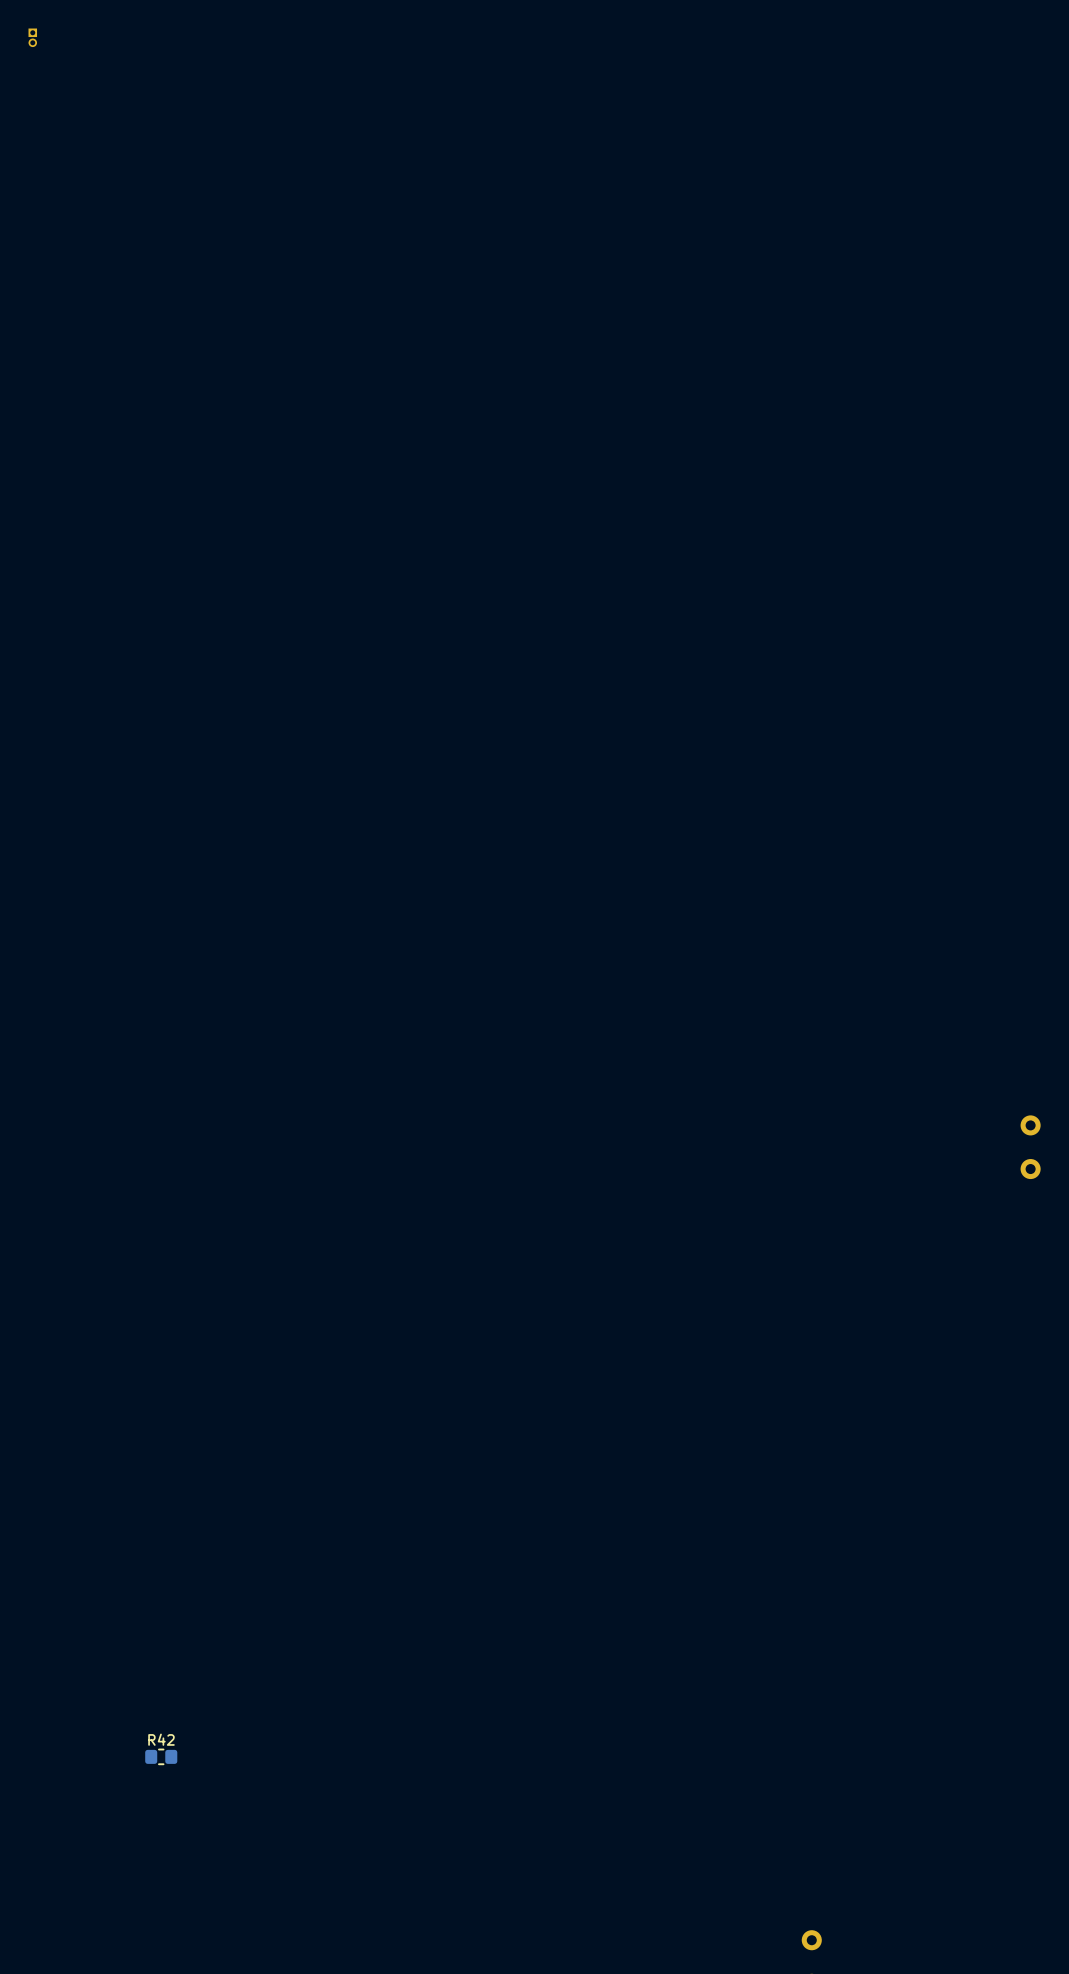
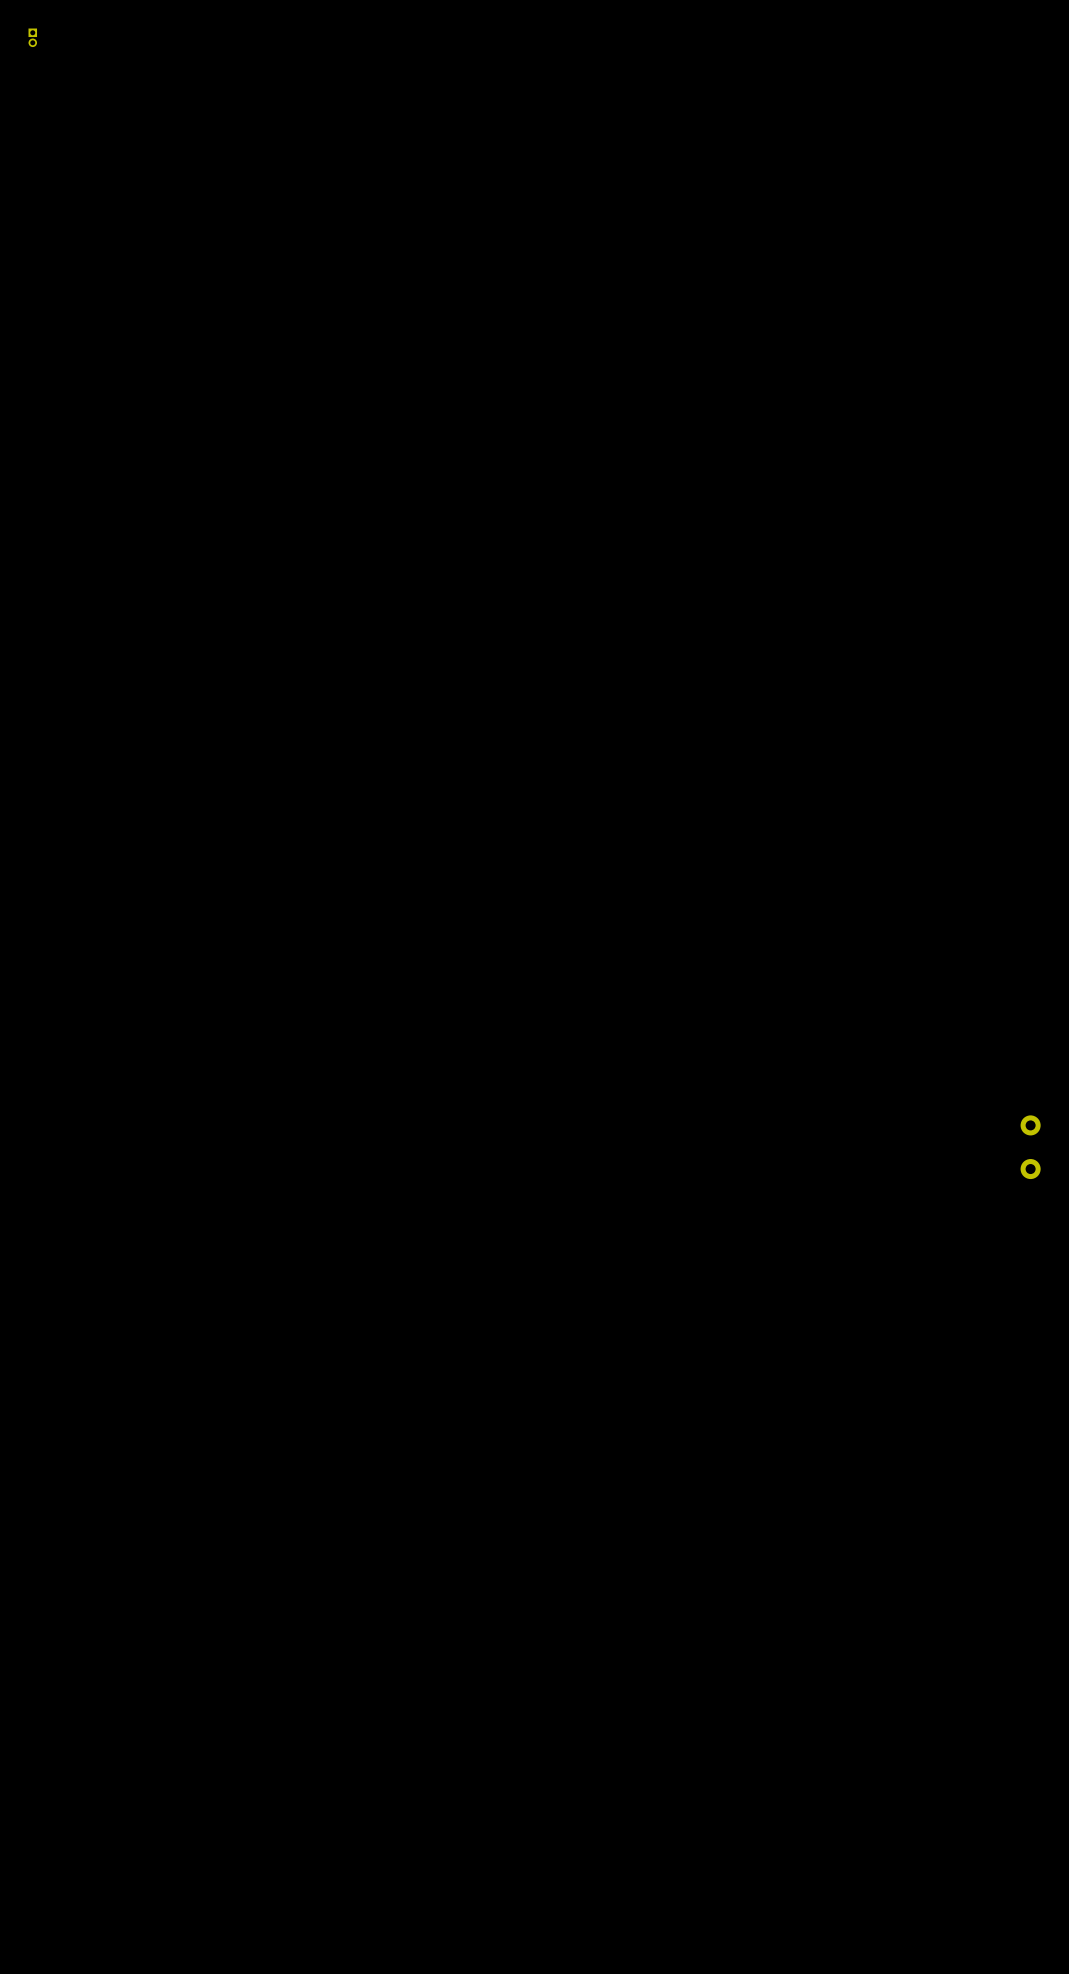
R42: (161, 1756) -> none
part: (811, 1940) -> none

